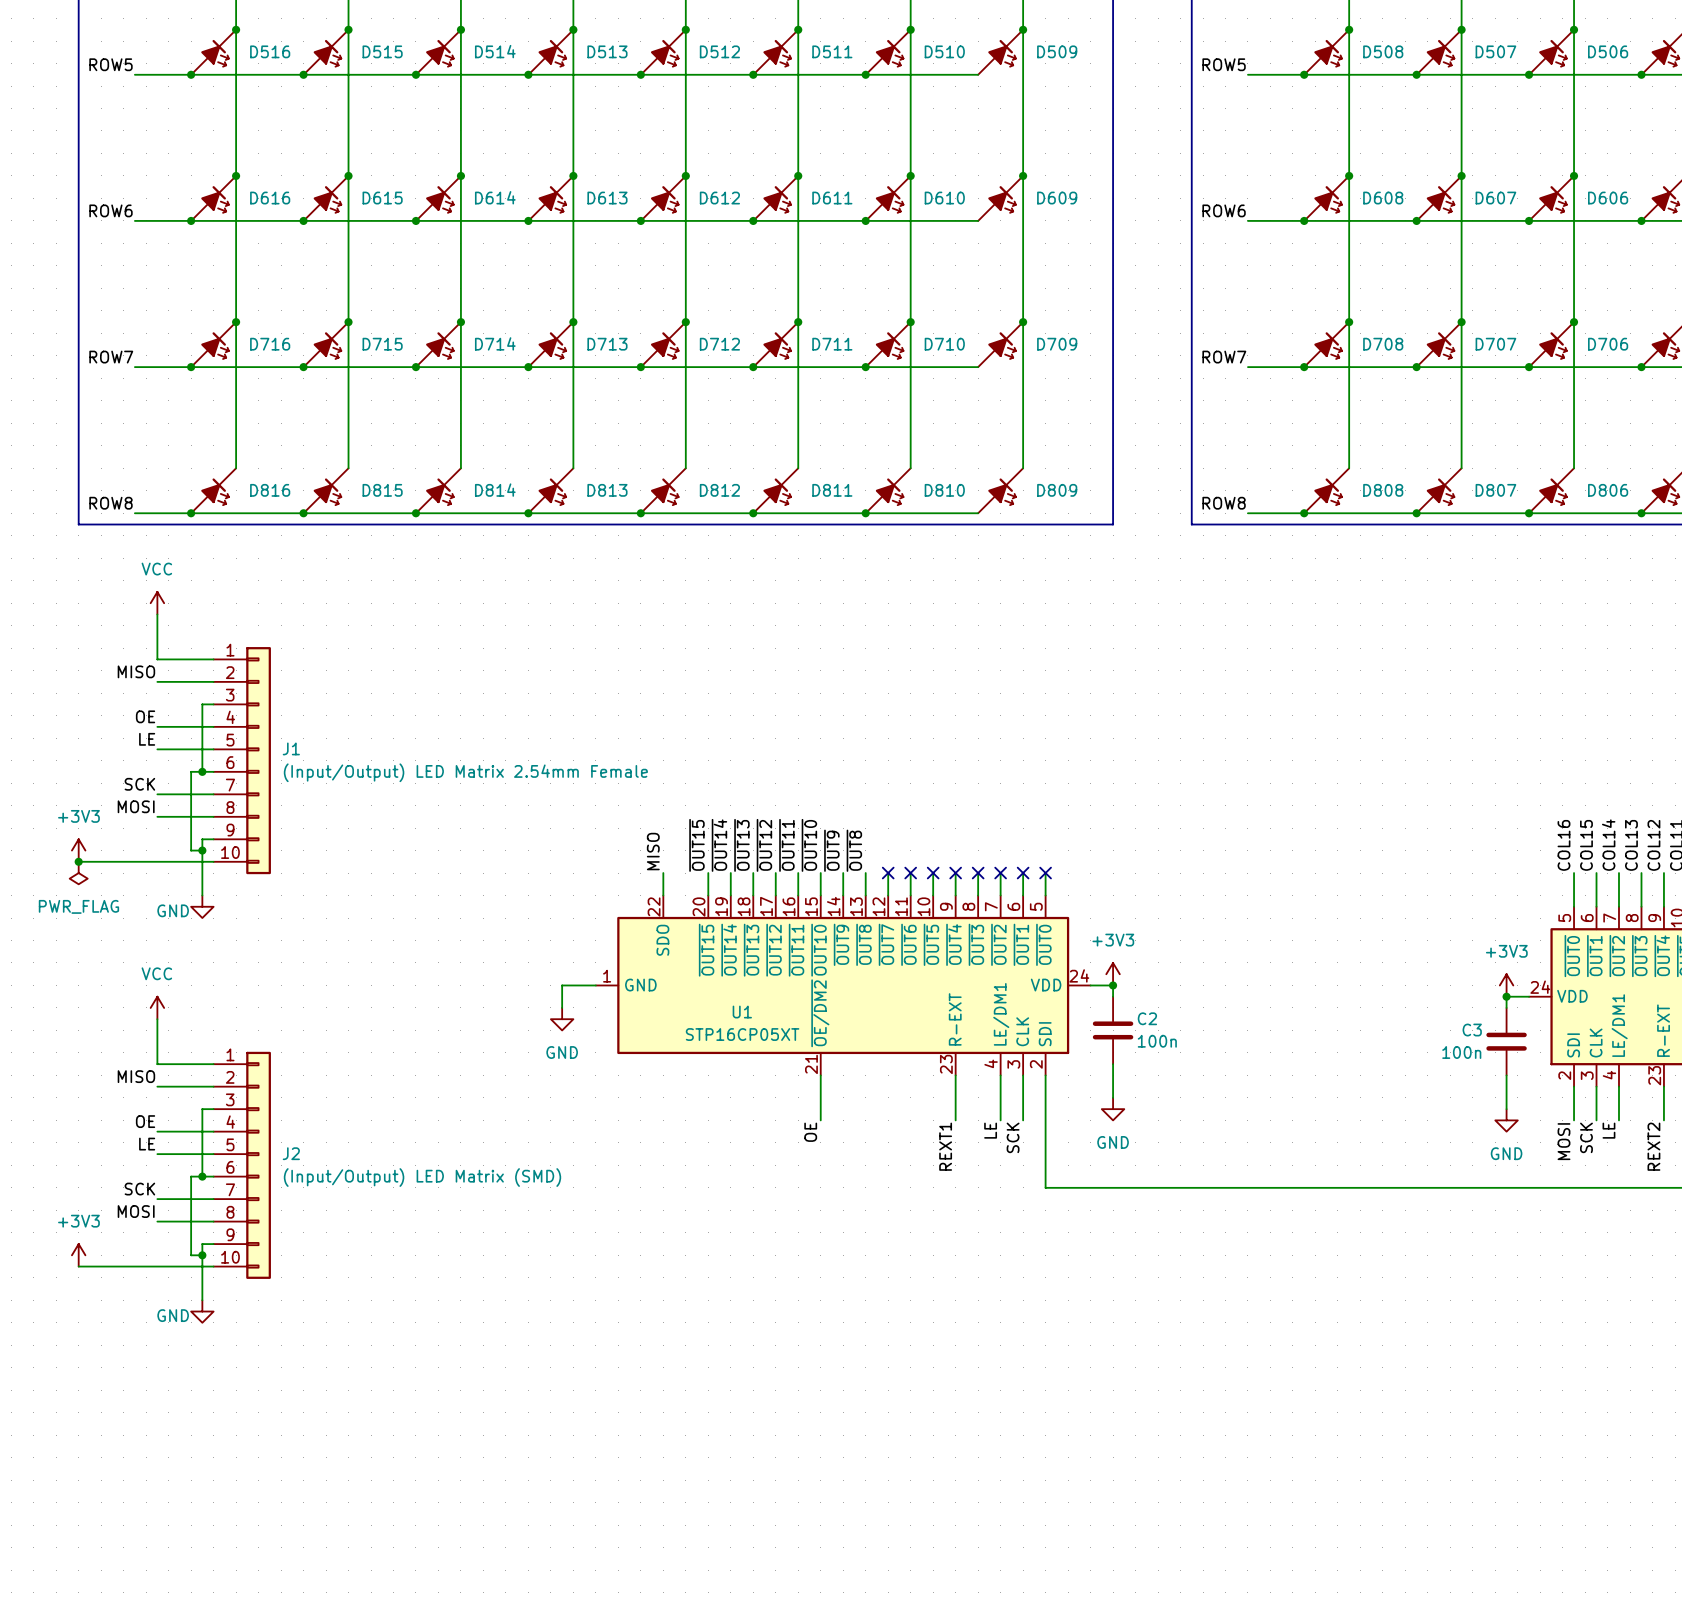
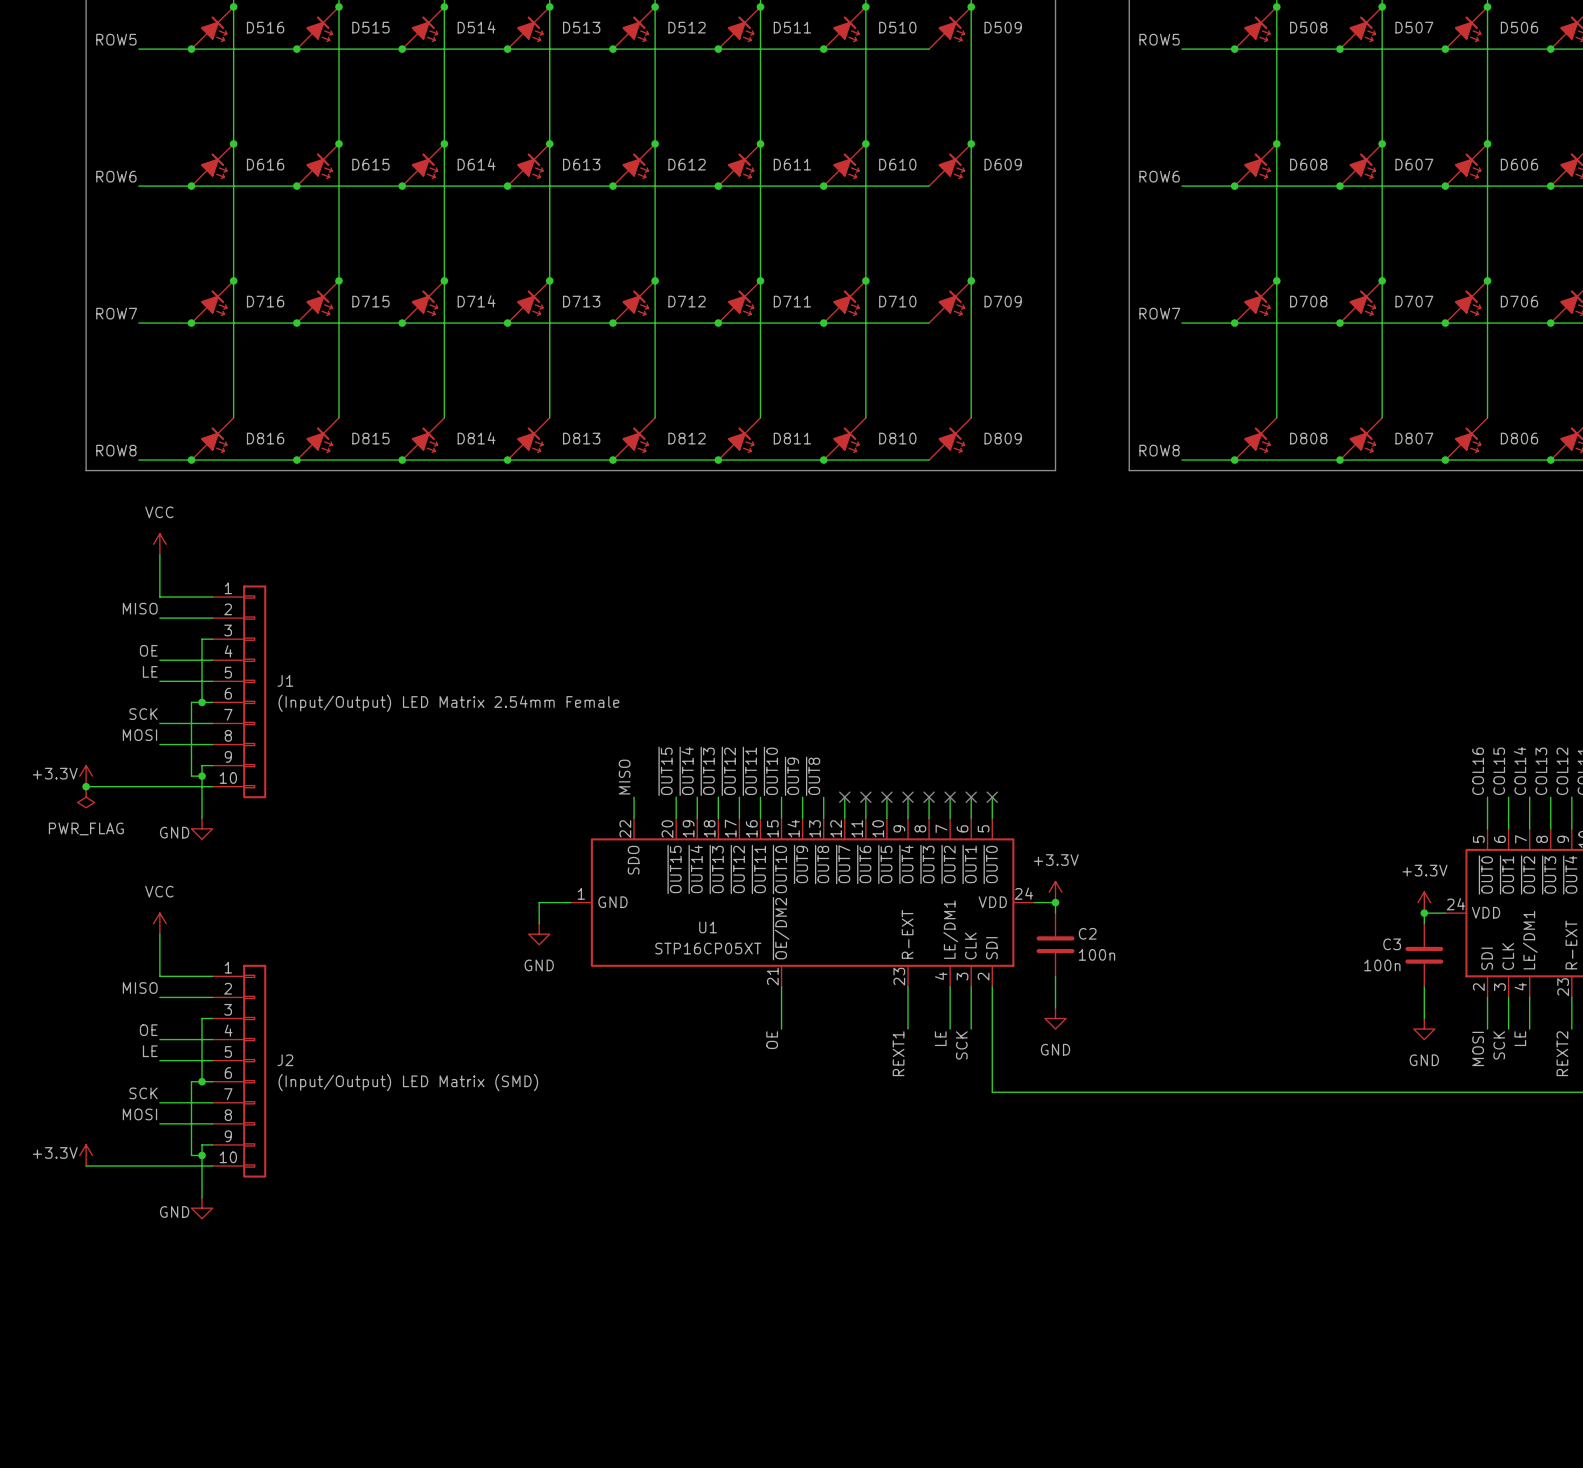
power symbol: +3V3 (78, 850) -> +3.3V (86, 776)
power symbol: +3V3 (1113, 974) -> +3.3V (1055, 892)
power symbol: +3V3 (1506, 985) -> +3.3V (1424, 902)
power symbol: +3V3 (78, 1255) -> +3.3V (86, 1155)

